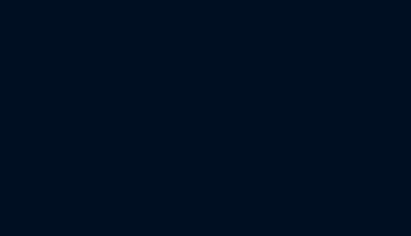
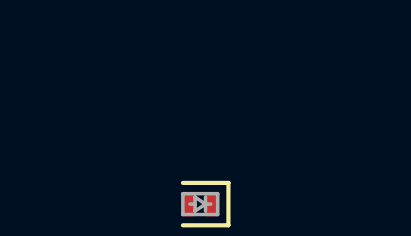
part: none -> (205, 204)

